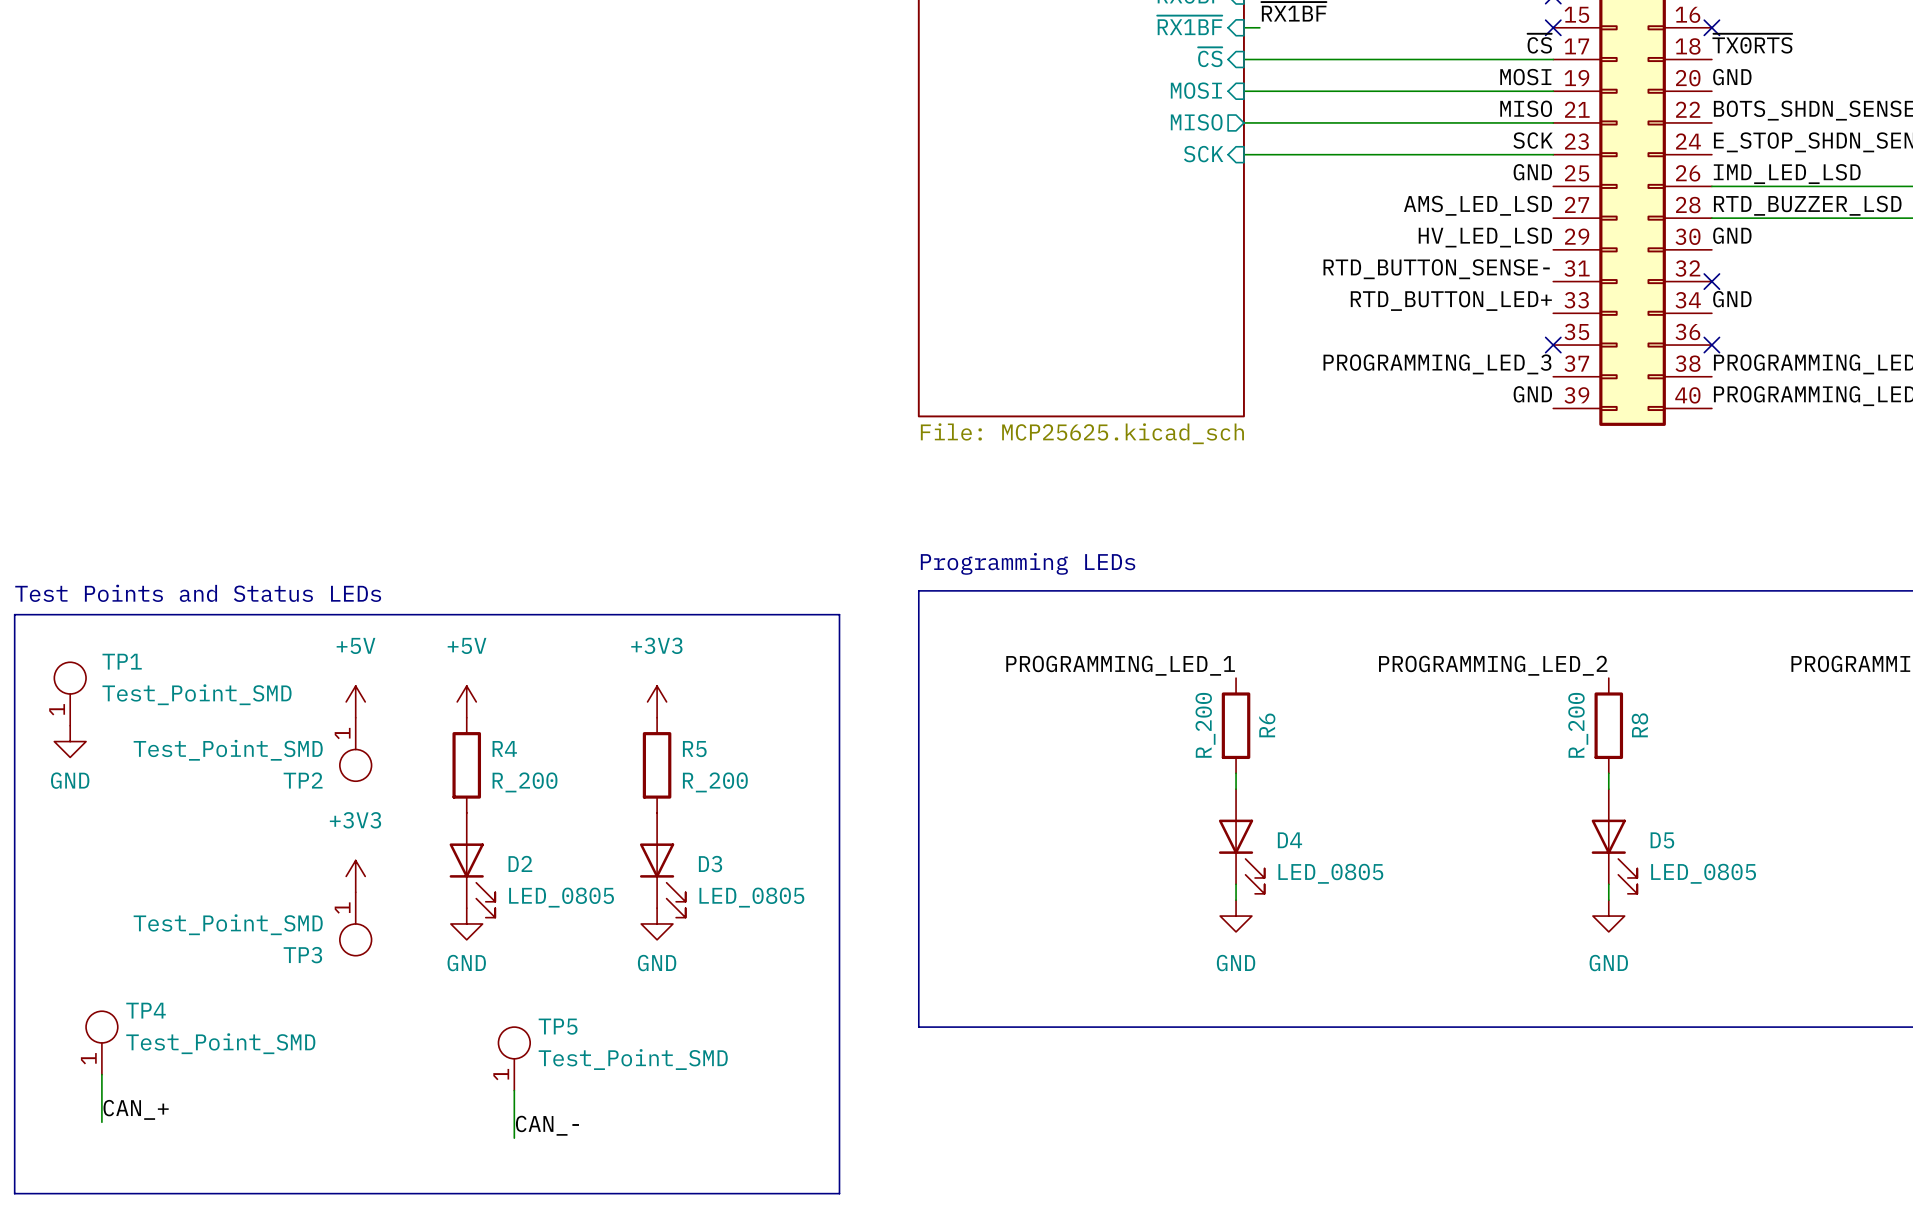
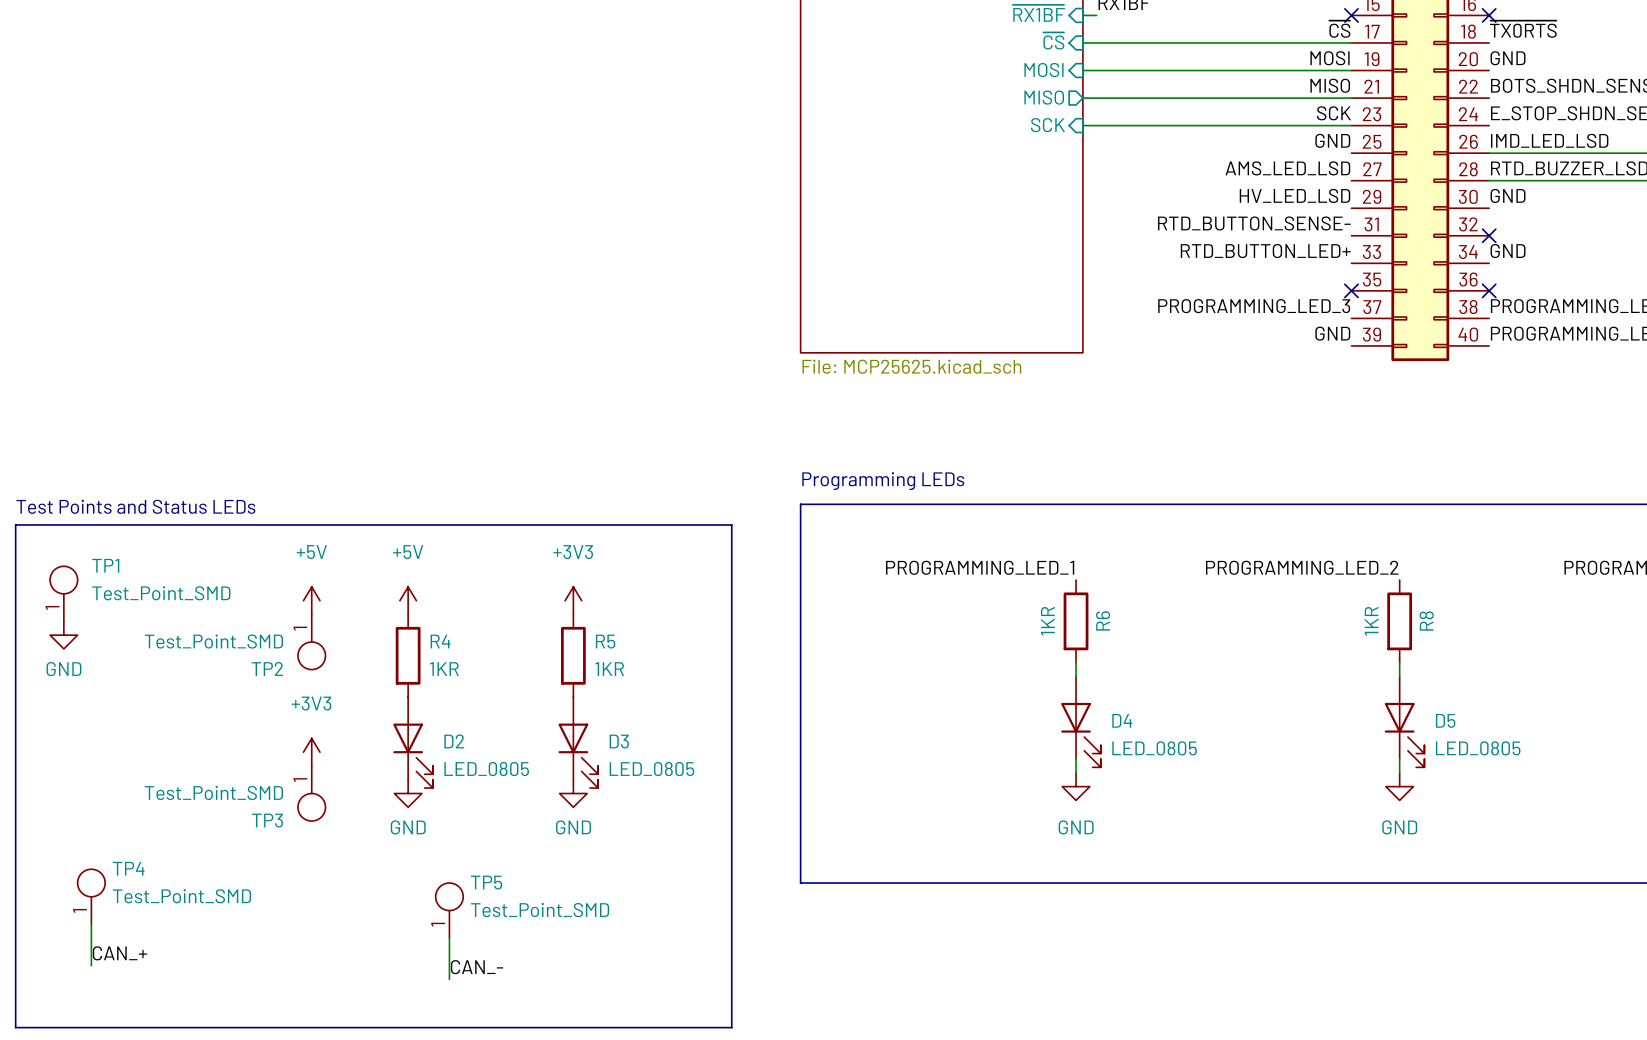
R6 value: R_200 (1205, 725) -> 1KR (1047, 621)
R8 value: R_200 (1578, 725) -> 1KR (1371, 621)
R4 value: R_200 (525, 782) -> 1KR (444, 669)
R5 value: R_200 (715, 782) -> 1KR (609, 669)

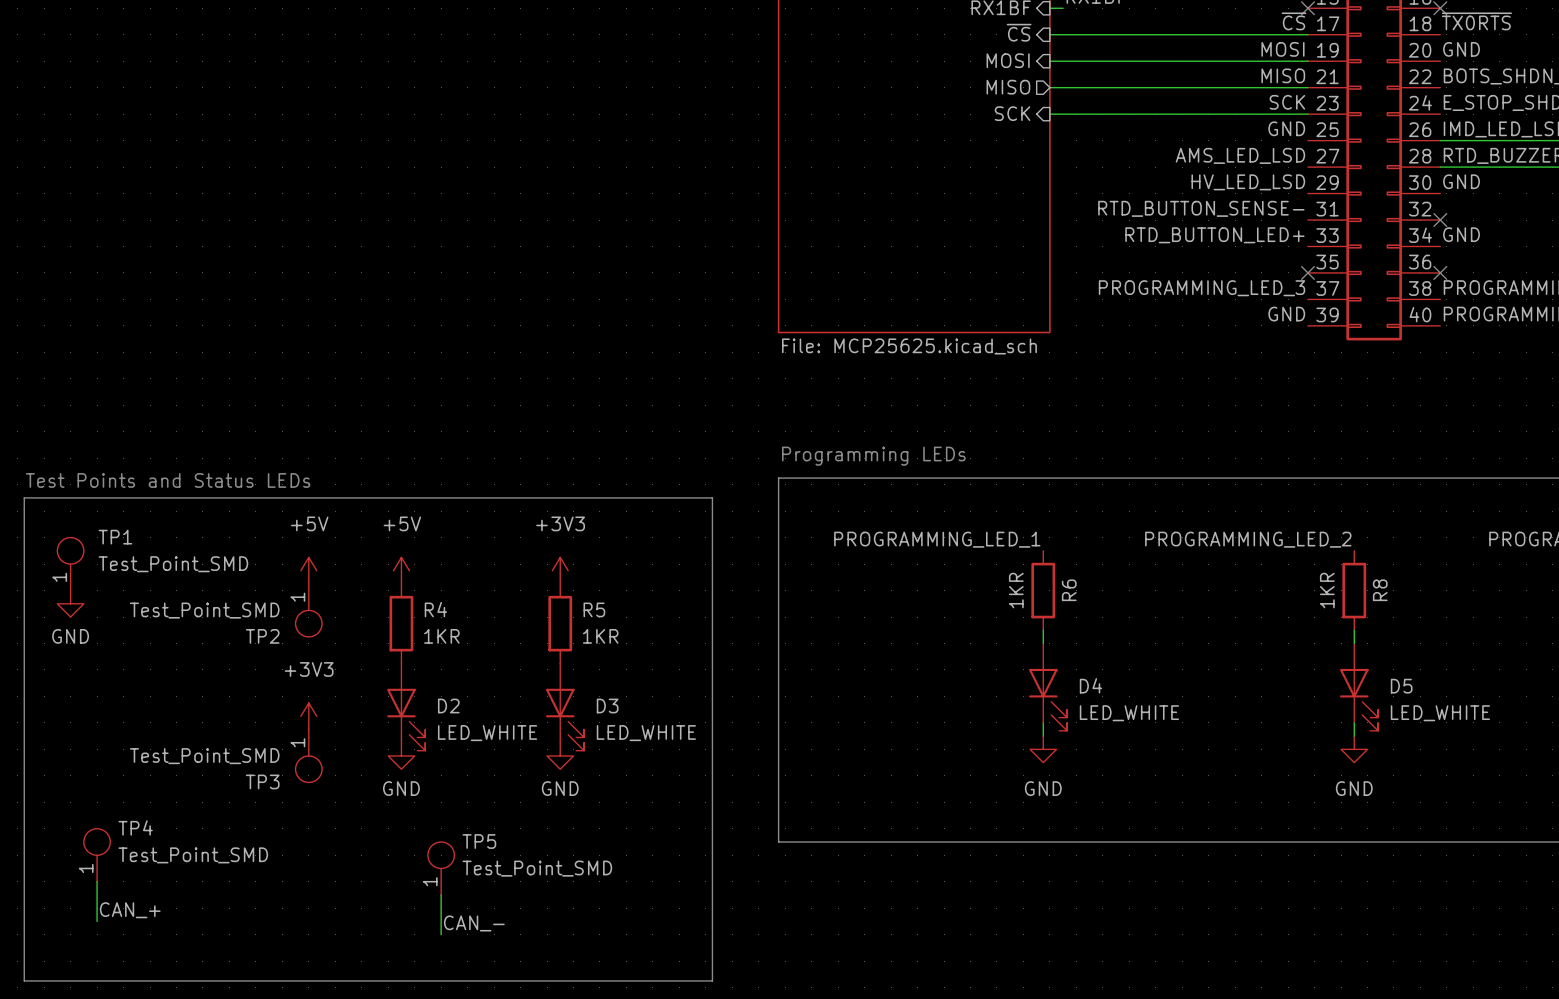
D4 value: LED_0805 (1154, 748) -> LED_WHITE (1129, 713)
D5 value: LED_0805 (1478, 748) -> LED_WHITE (1440, 713)
D2 value: LED_0805 (486, 769) -> LED_WHITE (487, 733)
D3 value: LED_0805 (651, 769) -> LED_WHITE (646, 733)

